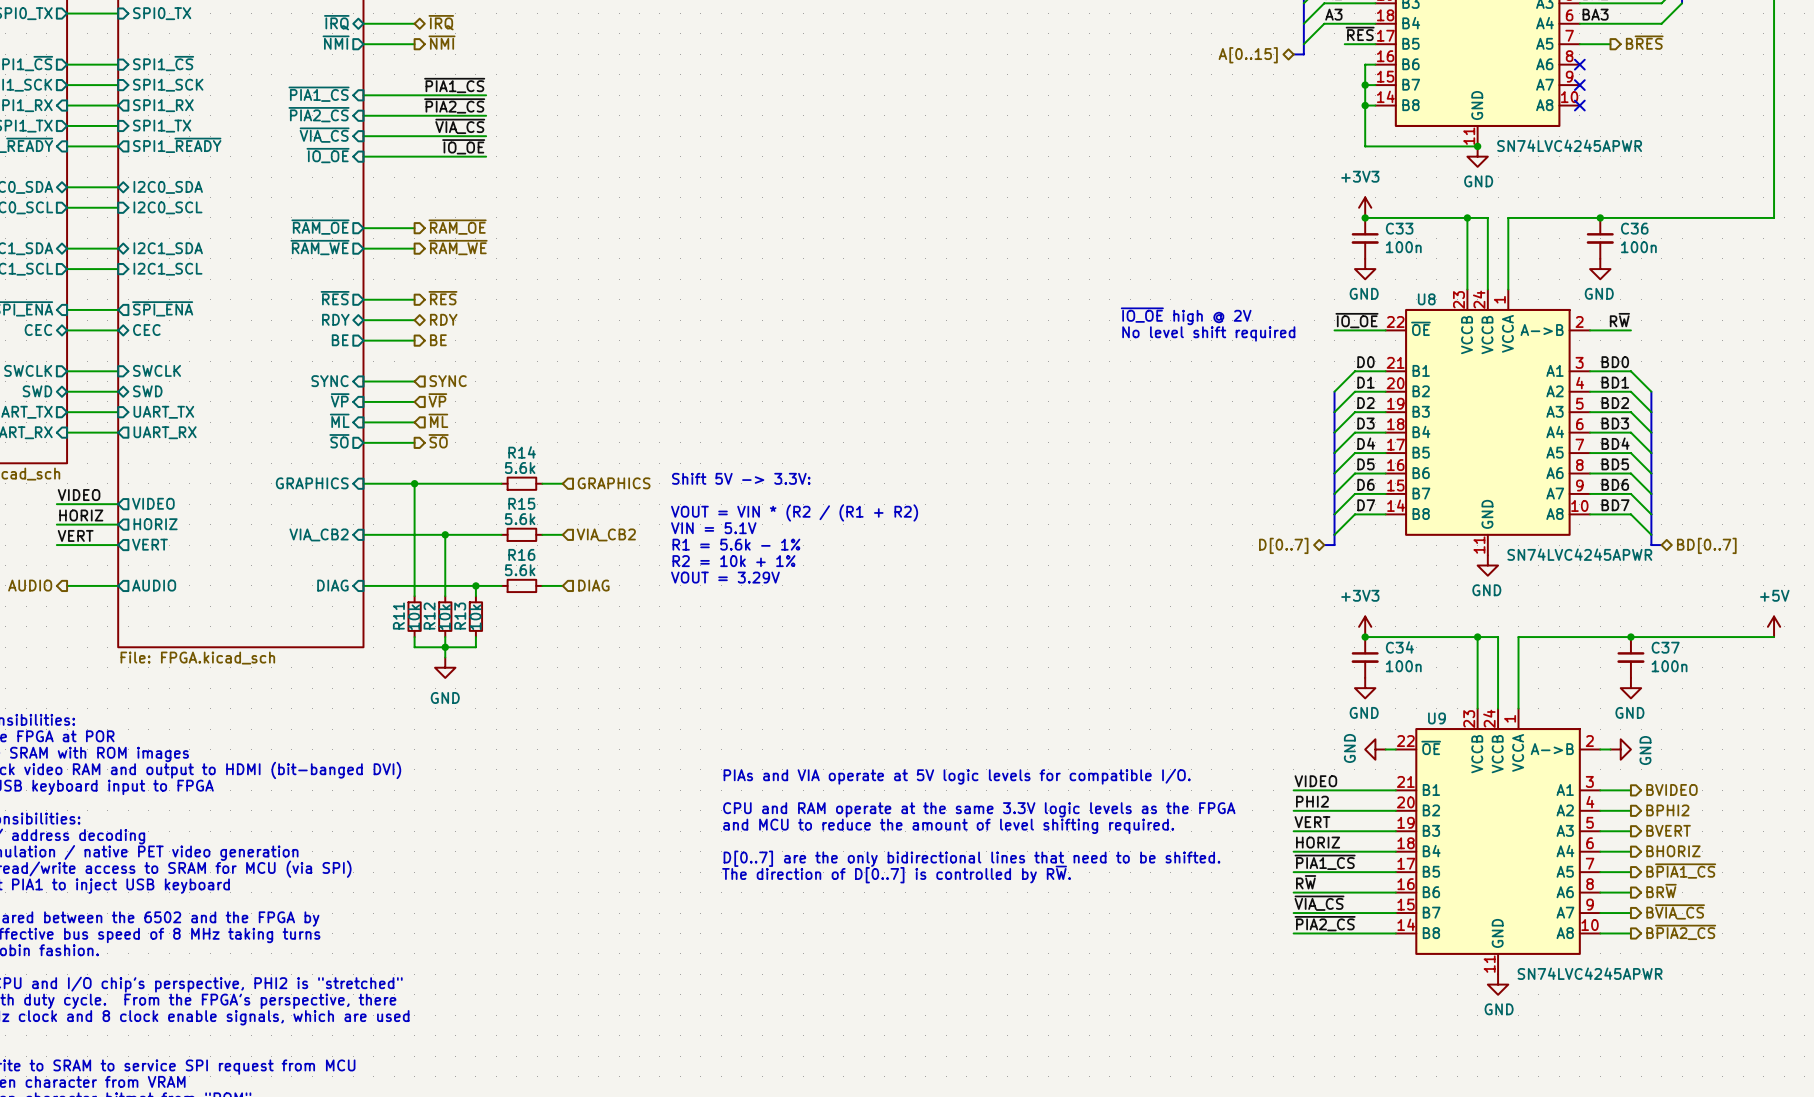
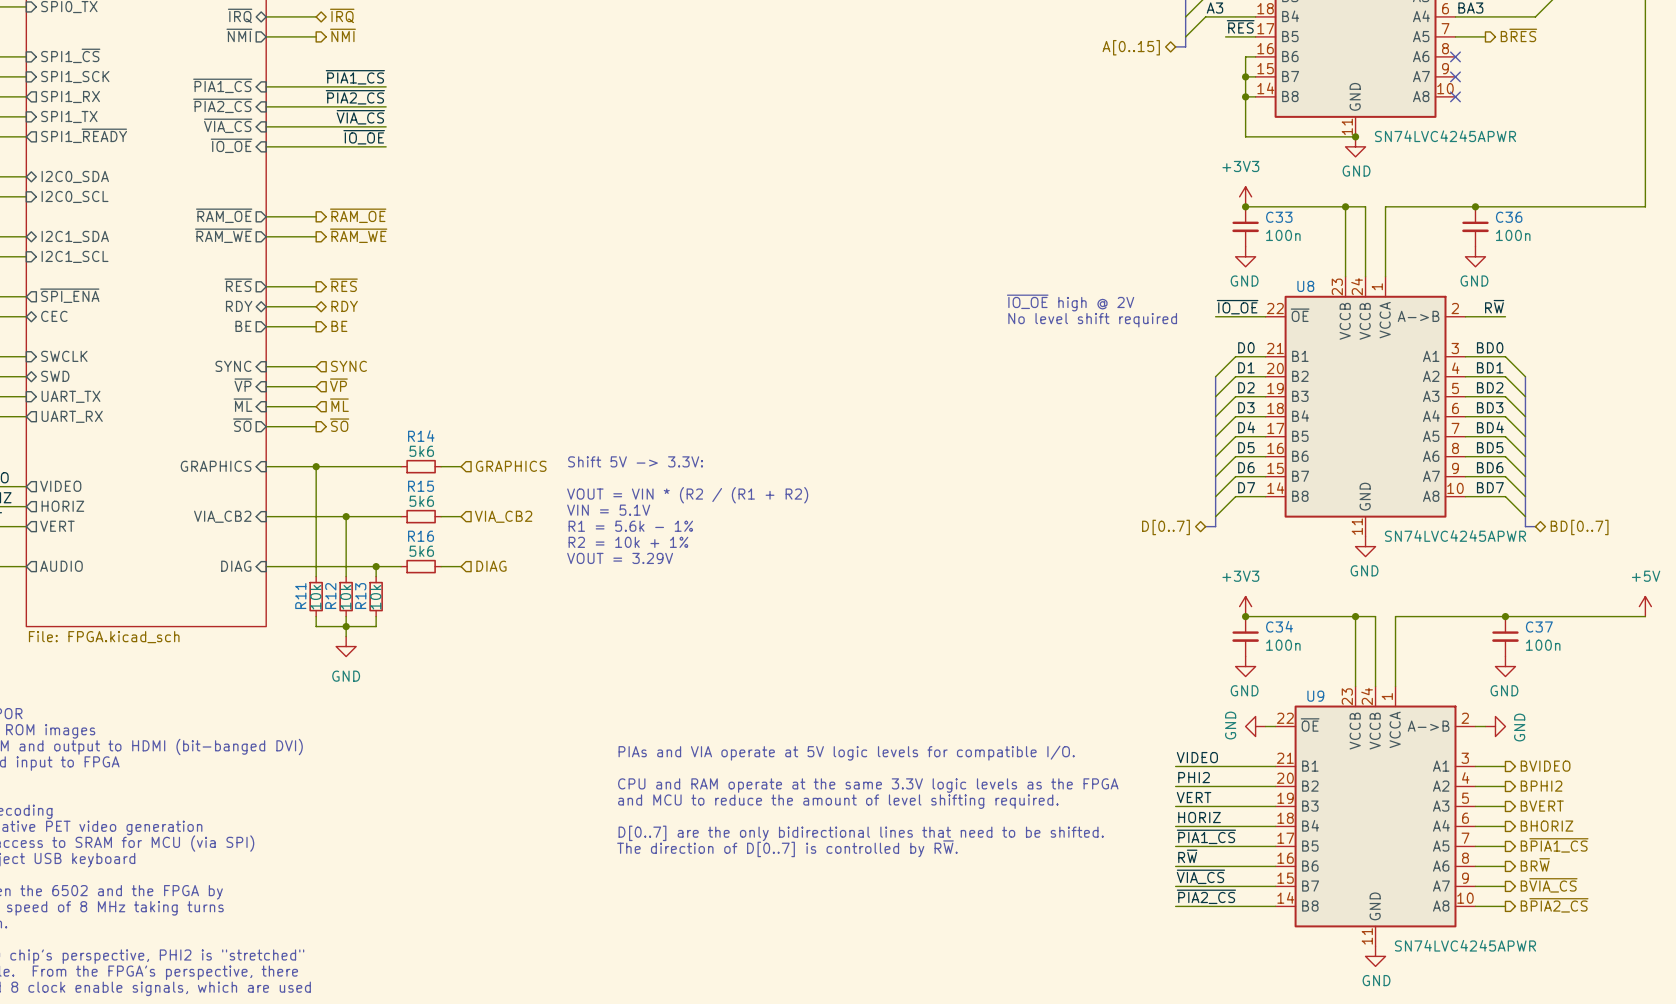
R14 value: 5.6k (520, 468) -> 5k6 (421, 451)
R15 value: 5.6k (520, 519) -> 5k6 (421, 501)
R16 value: 5.6k (520, 570) -> 5k6 (421, 551)

